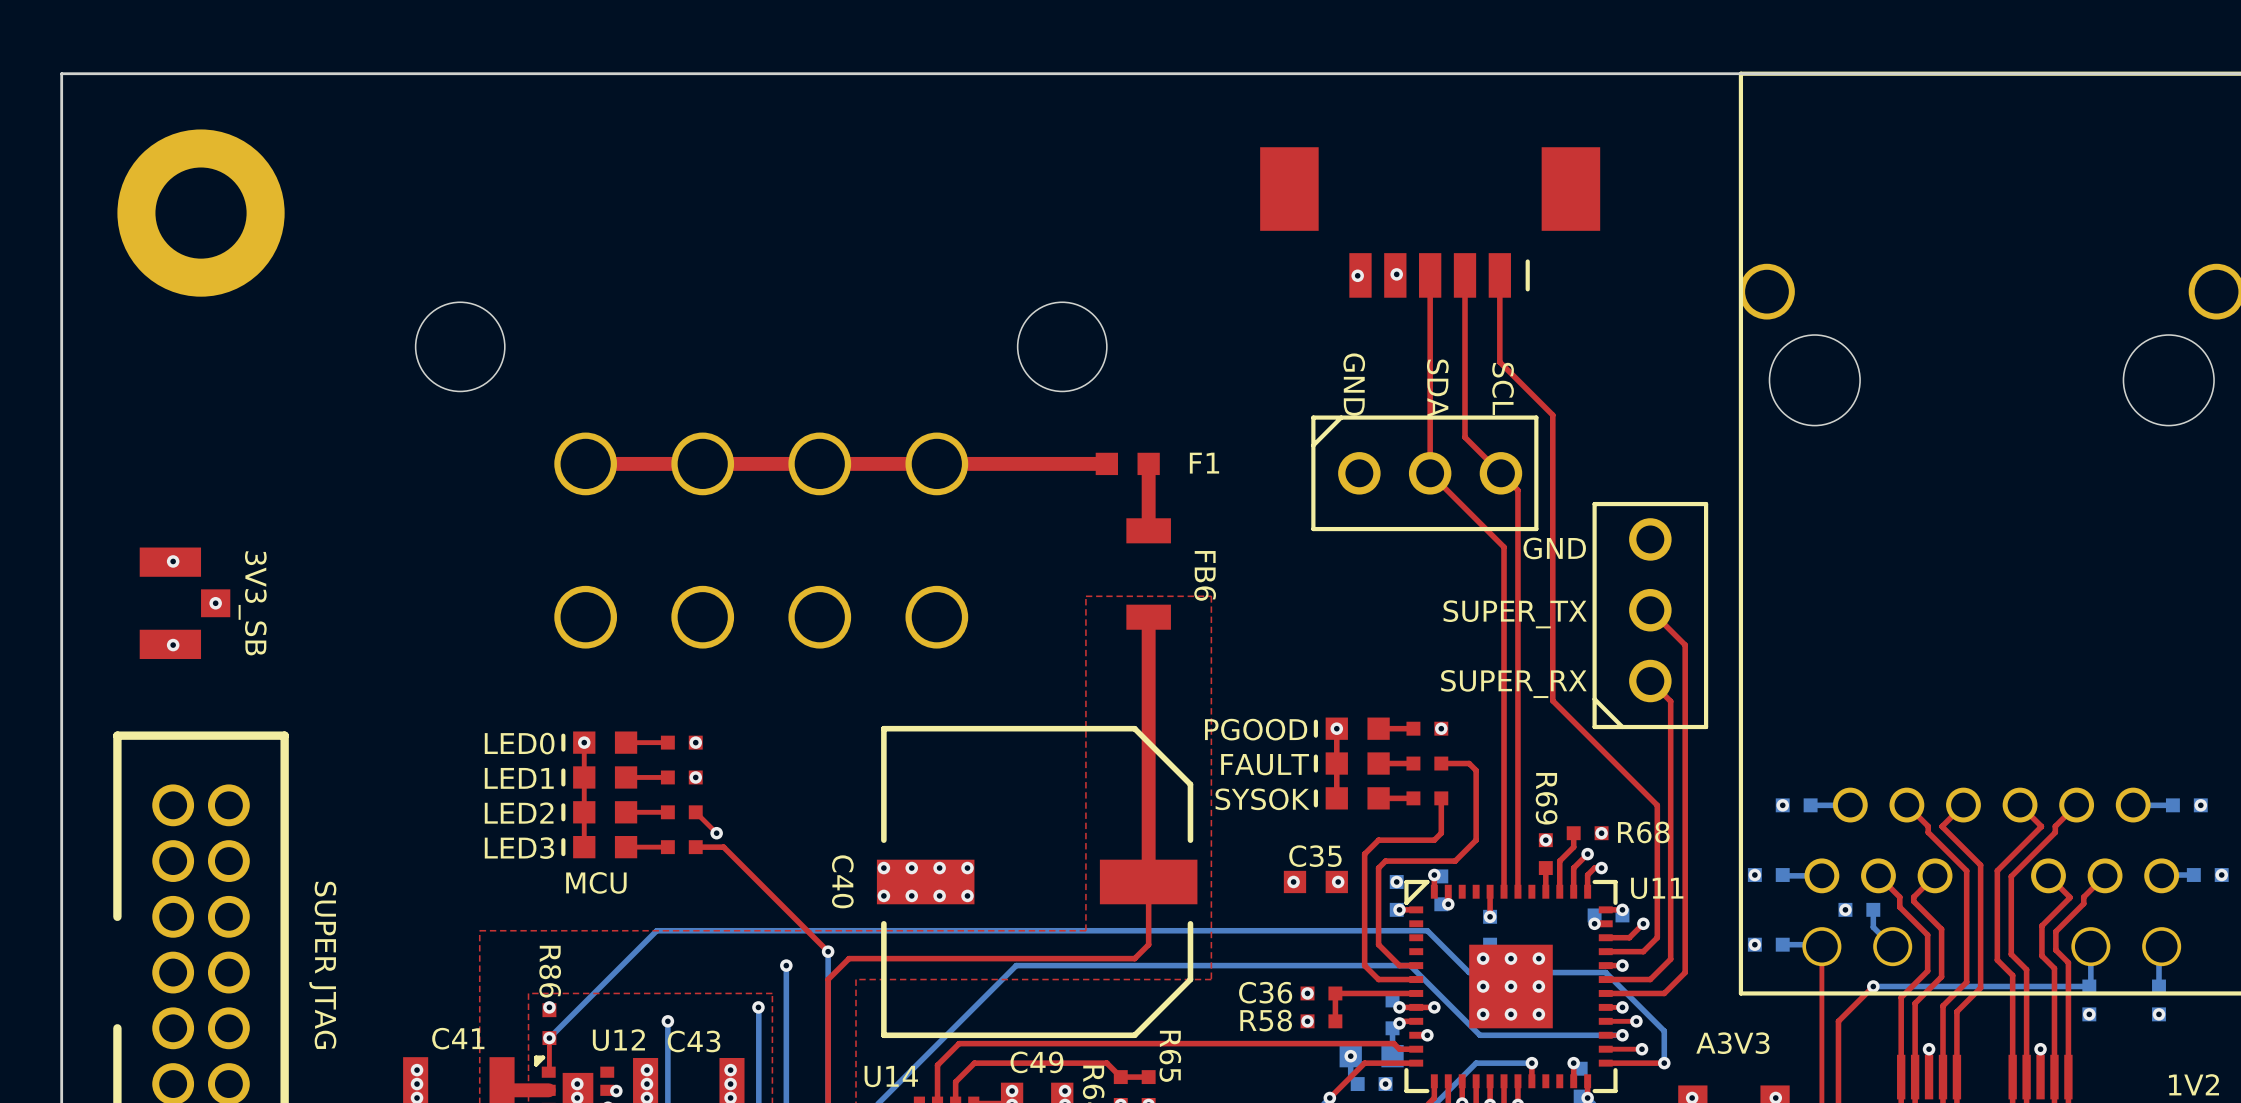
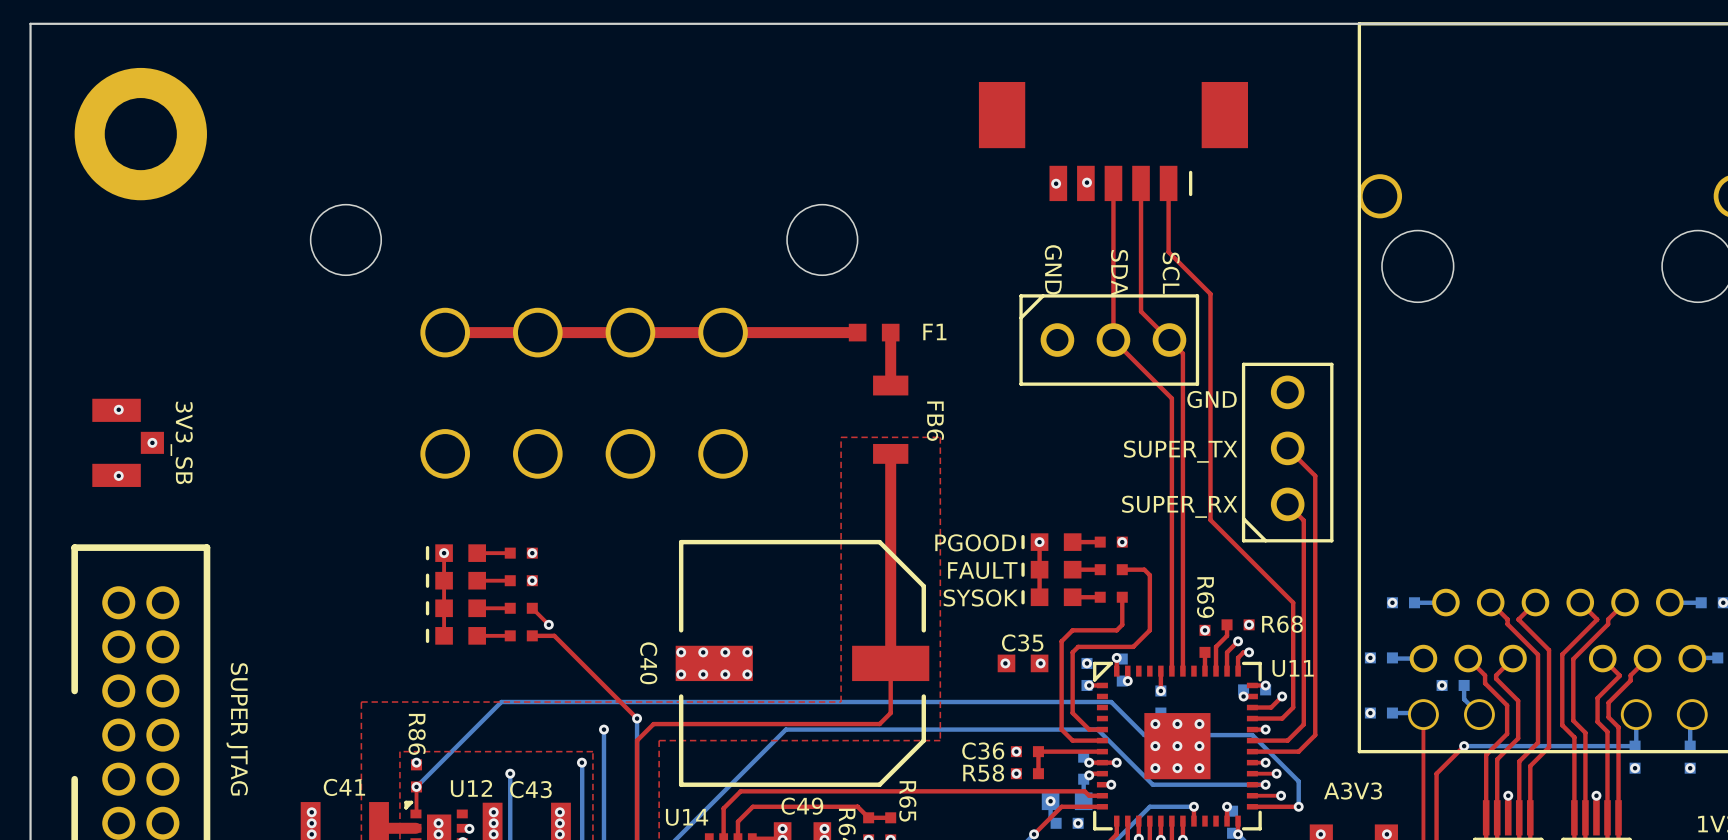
text: LED0 (519, 743) -> none
text: LED1 (519, 778) -> none
text: LED2 (519, 813) -> none
text: LED3 (519, 848) -> none
text: MCU (596, 882) -> none

